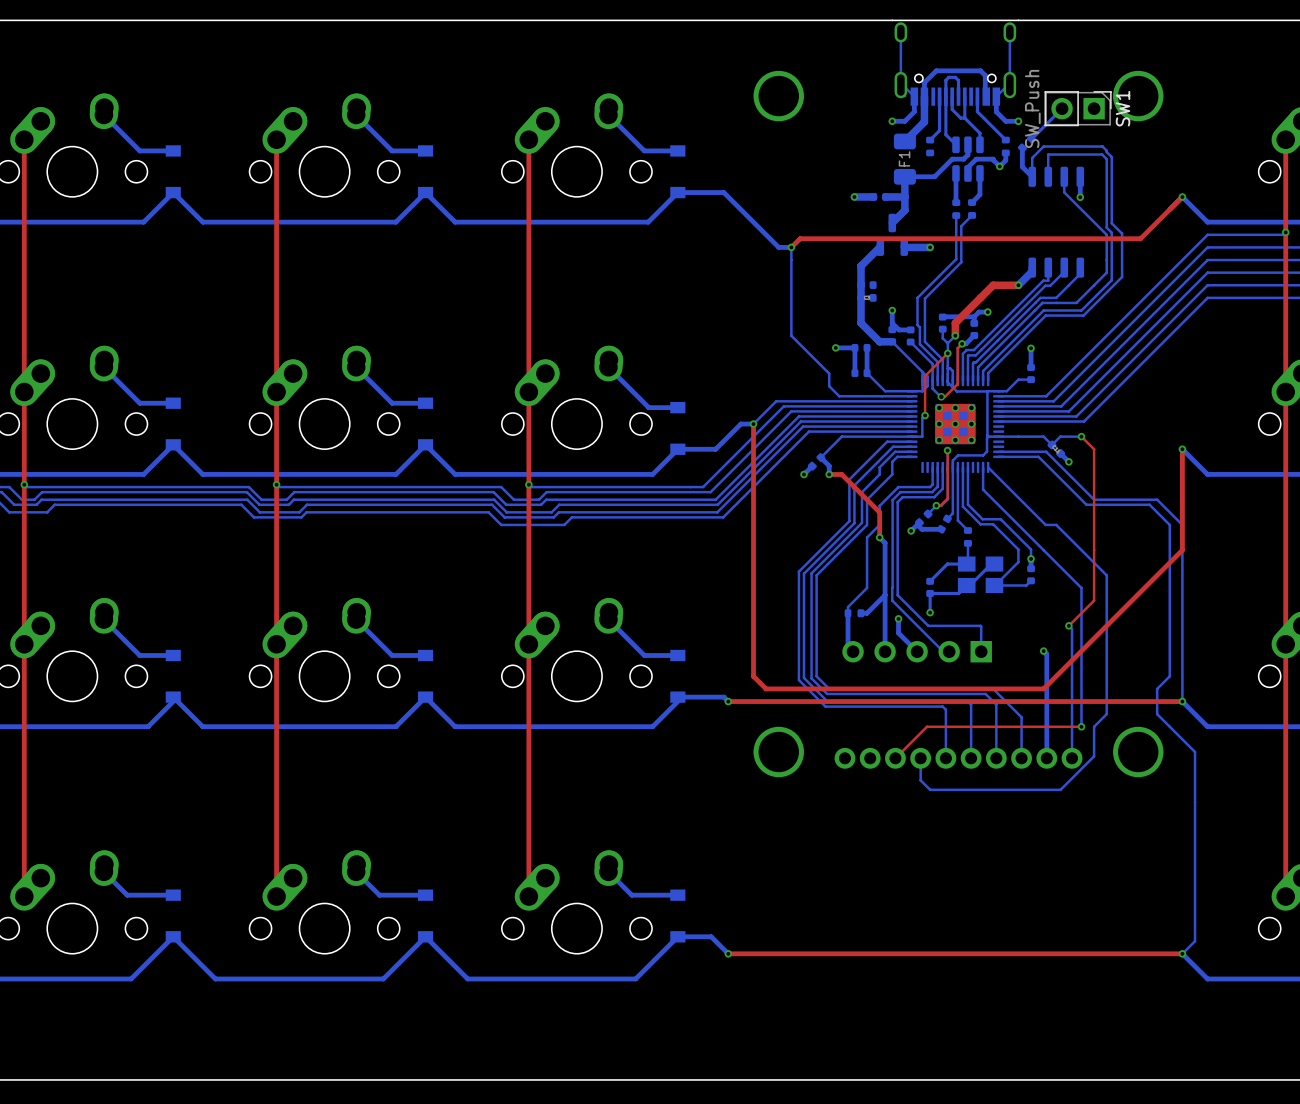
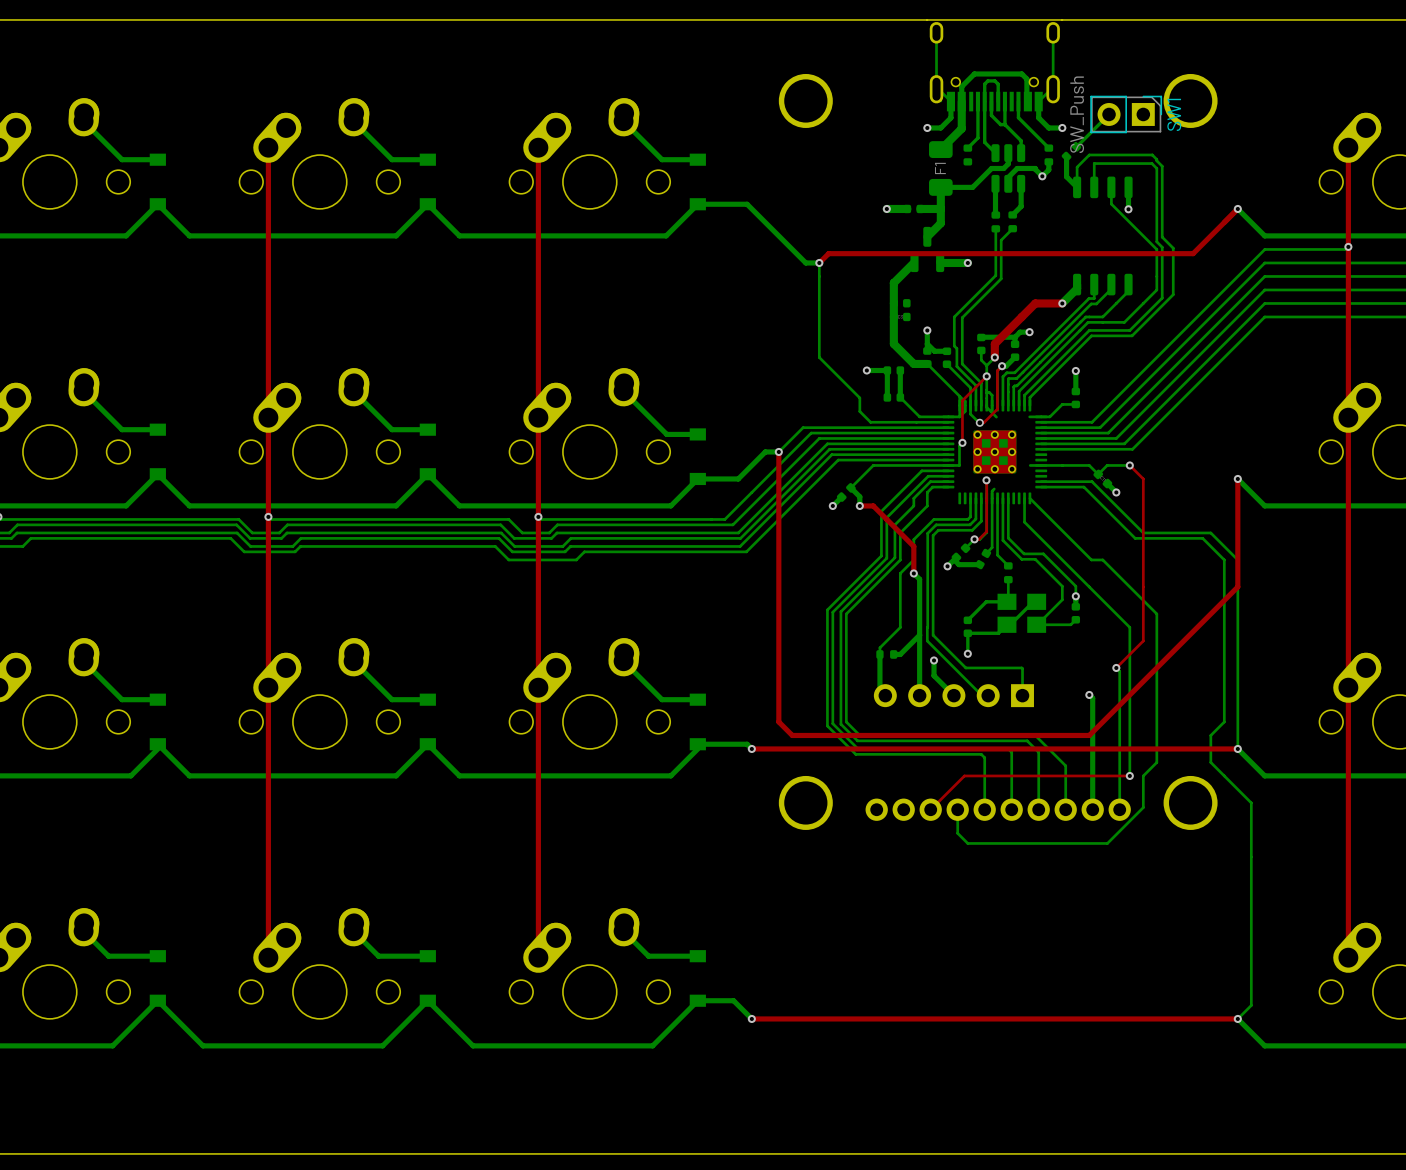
bottom track: (956, 391) (987, 391) -> none
bottom track: (987, 391) (987, 451) (983, 455) (958, 455) (954, 458) -> none

